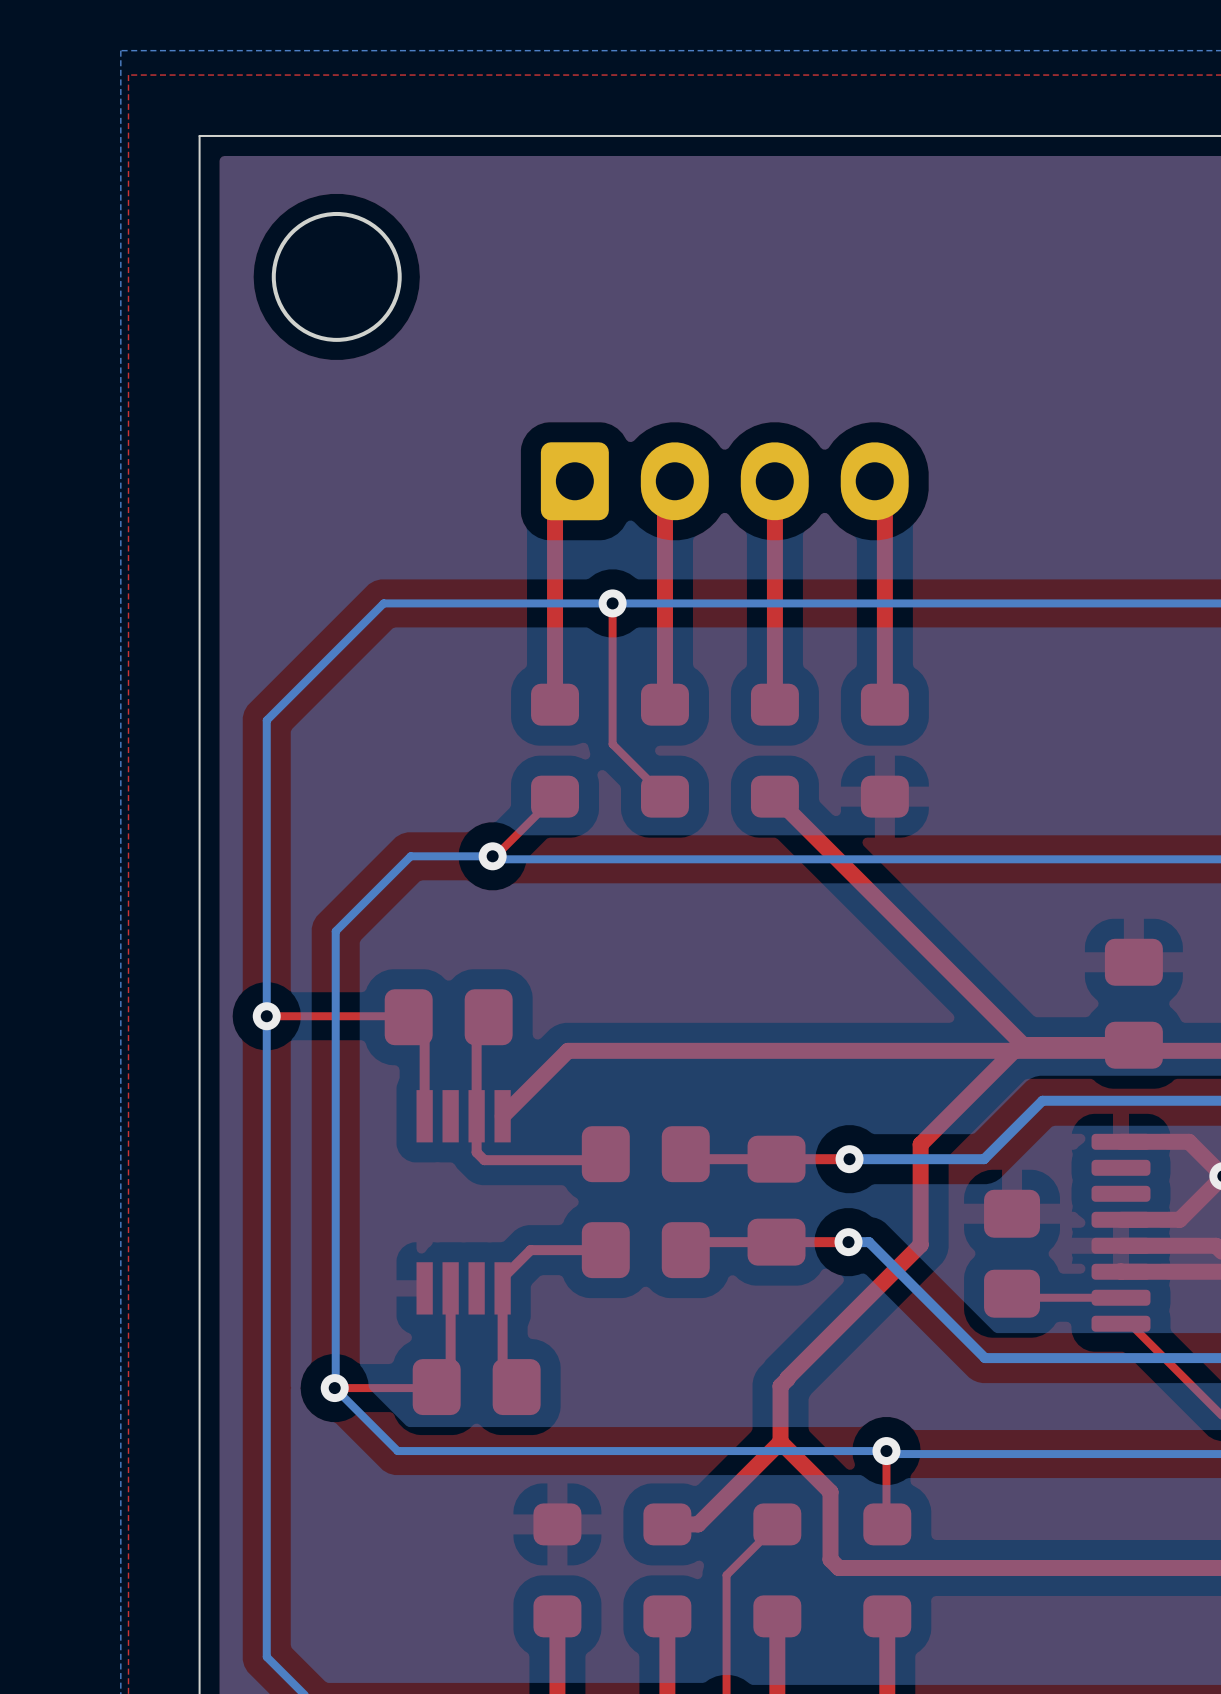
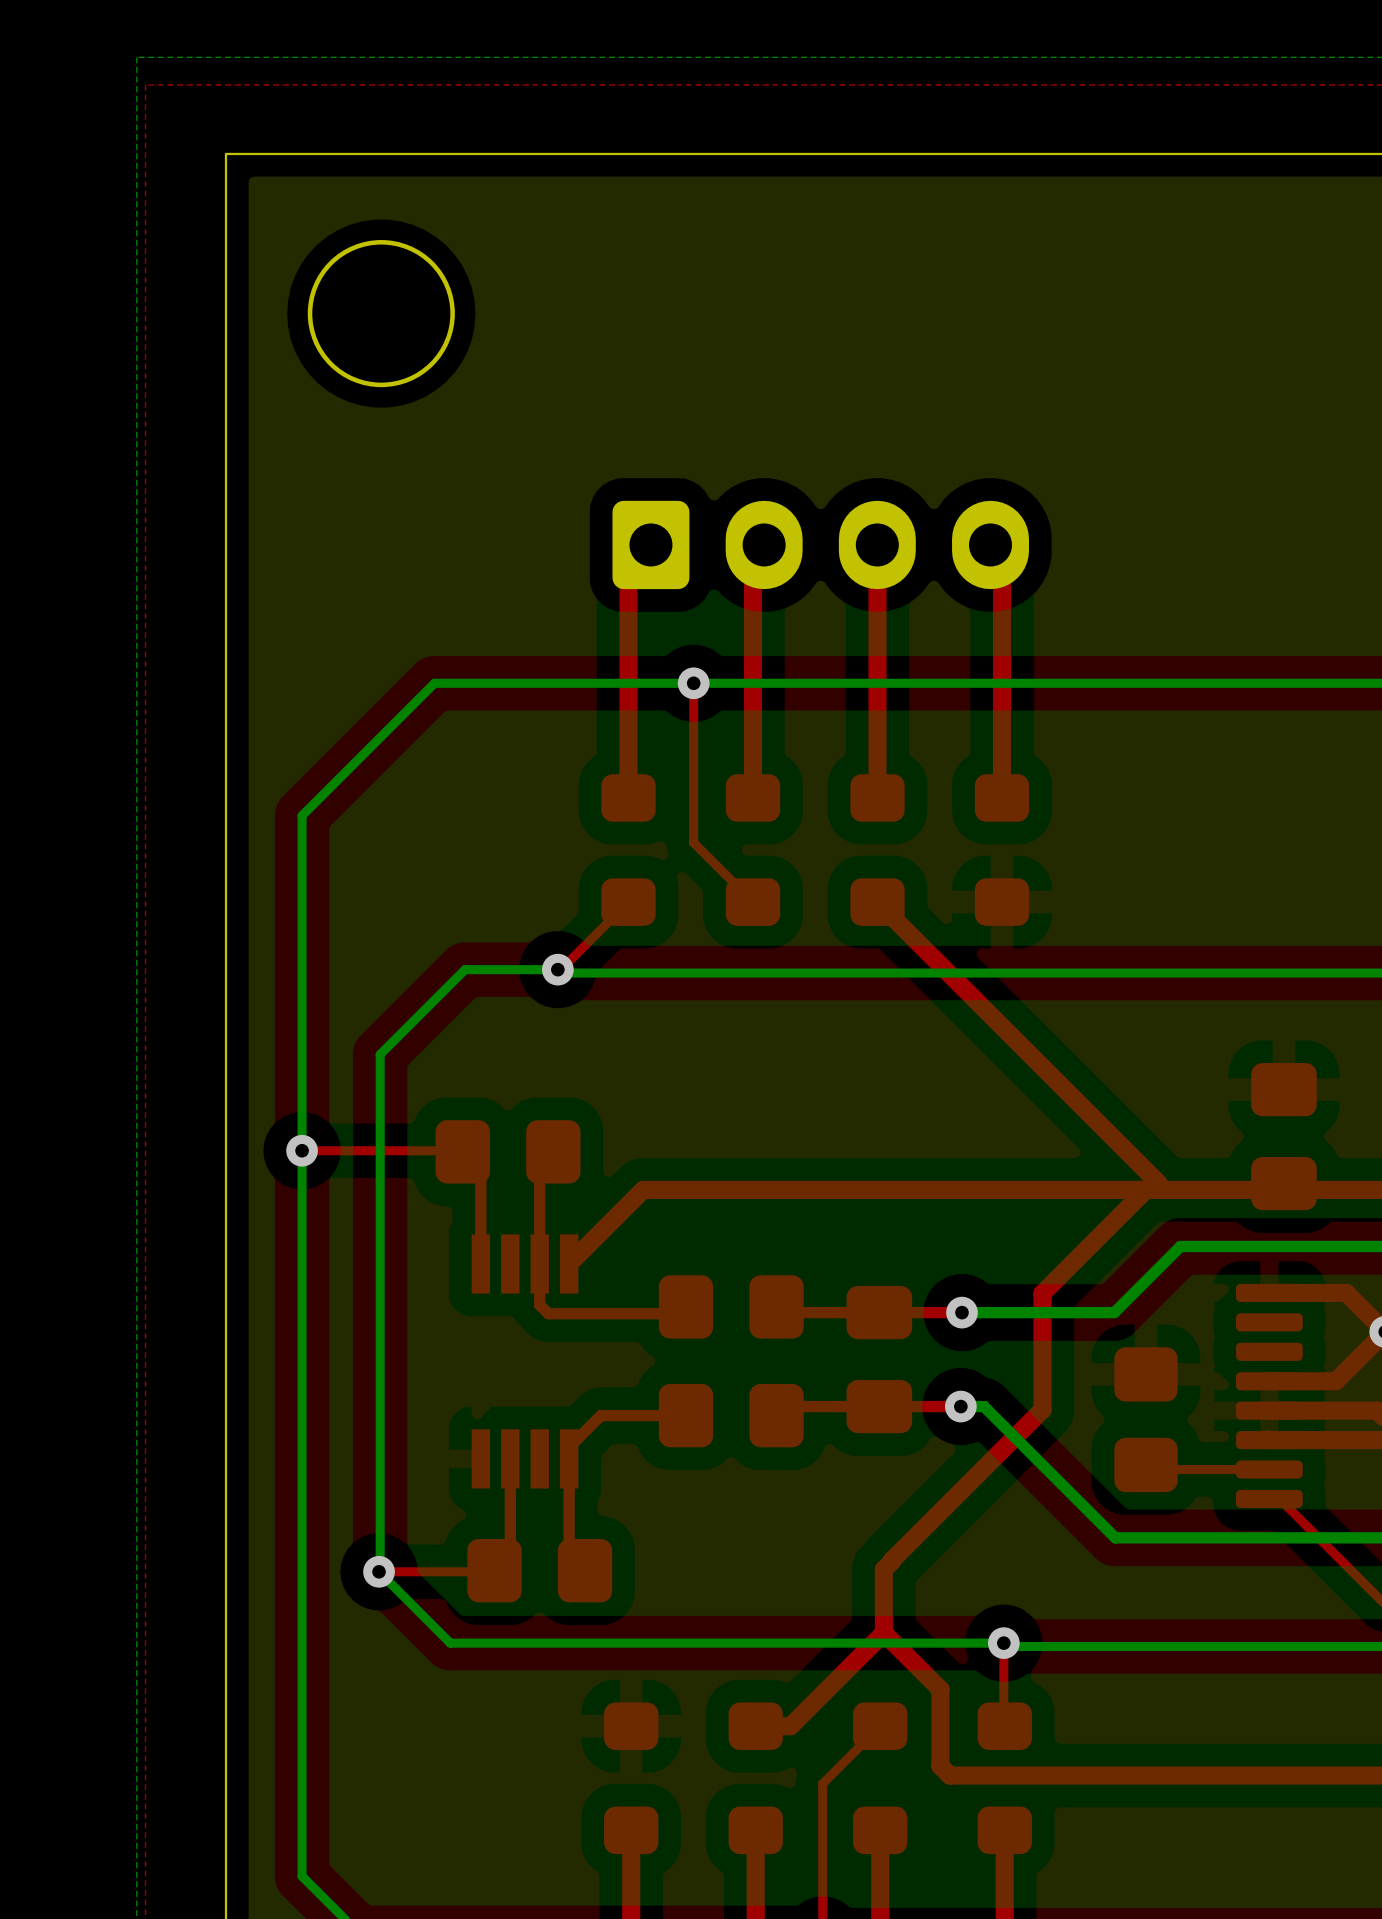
top track: (1133, 1045) (1019, 1045) (920, 1144) -> (1154, 1183) (1152, 1183) (1042, 1293) (1042, 1295)

